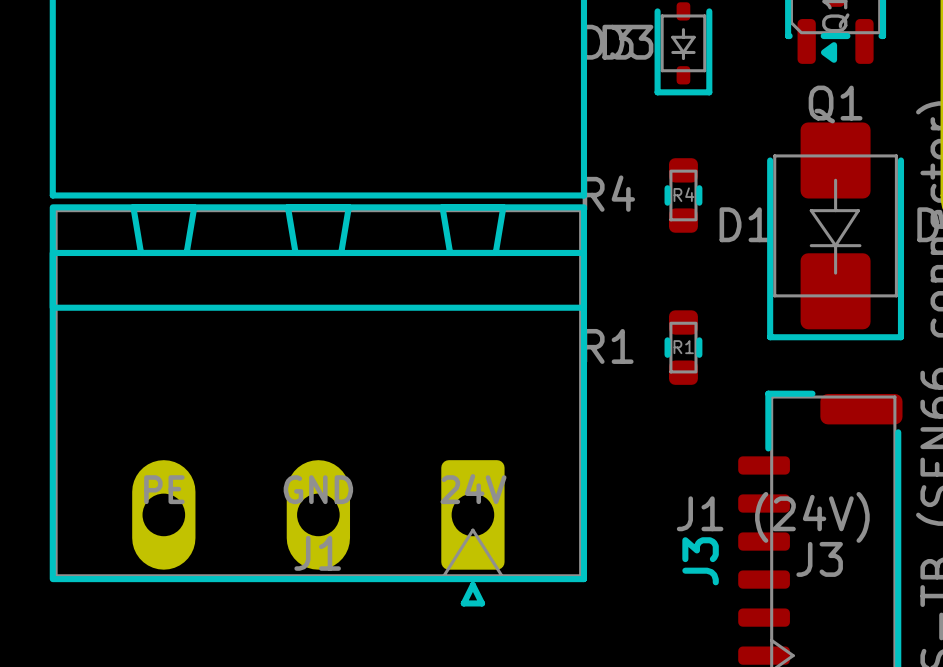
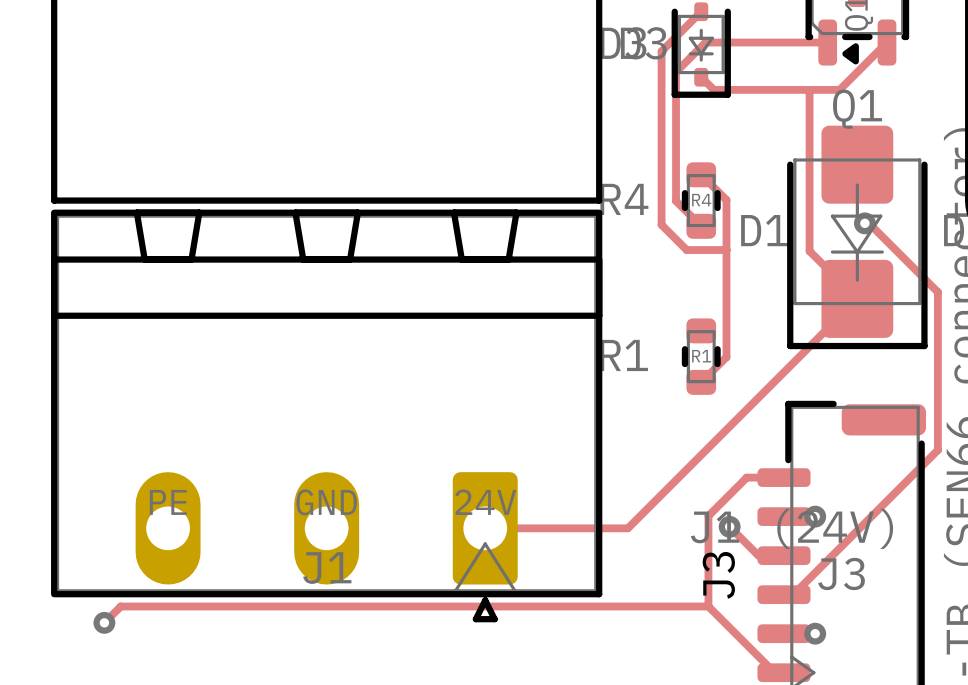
track: none -> (701, 11) (661, 51) (661, 224) (686, 250) (726, 250)
track: none -> (827, 42) (705, 42) (676, 72) (676, 201) (701, 226)
track: none -> (887, 42) (839, 89) (713, 89) (701, 77)
track: none -> (809, 89) (809, 251) (857, 298) (627, 528) (485, 528)
track: none -> (701, 174) (726, 200) (726, 357) (701, 382)
track: none -> (864, 223) (869, 223) (937, 292) (937, 450) (793, 594) (783, 594)
via: none -> (864, 223)
track: none -> (783, 477) (746, 477) (708, 515) (708, 606)
via: none -> (815, 516)
track: none -> (729, 526) (758, 555) (783, 555)
via: none -> (729, 526)
track: none -> (708, 606) (120, 606) (104, 622)
track: none -> (708, 606) (774, 672) (783, 672)
via: none -> (104, 622)
via: none -> (815, 633)

